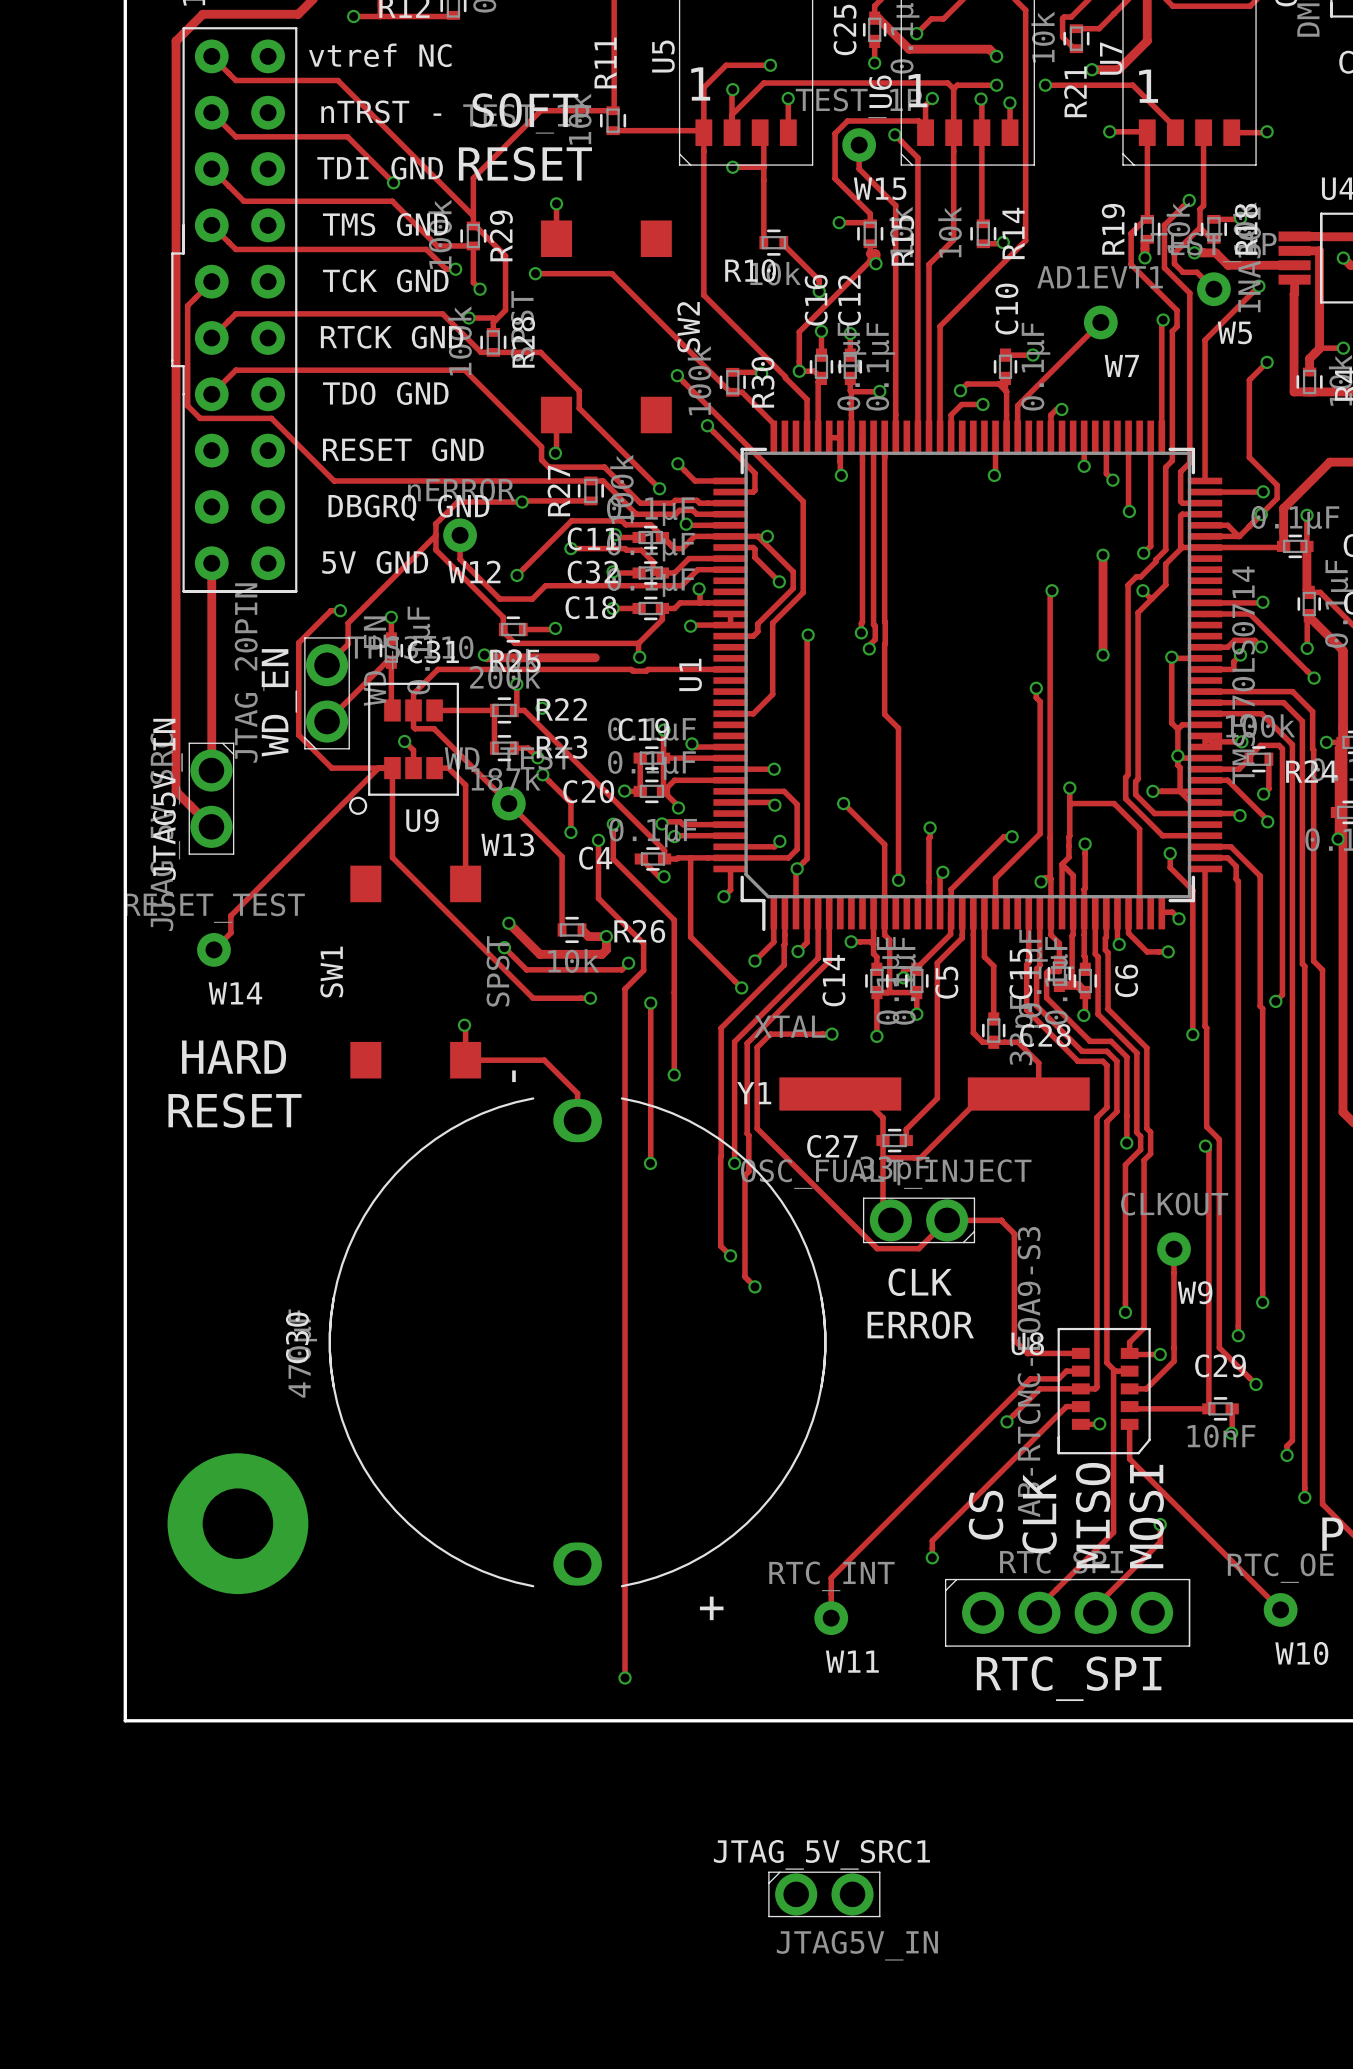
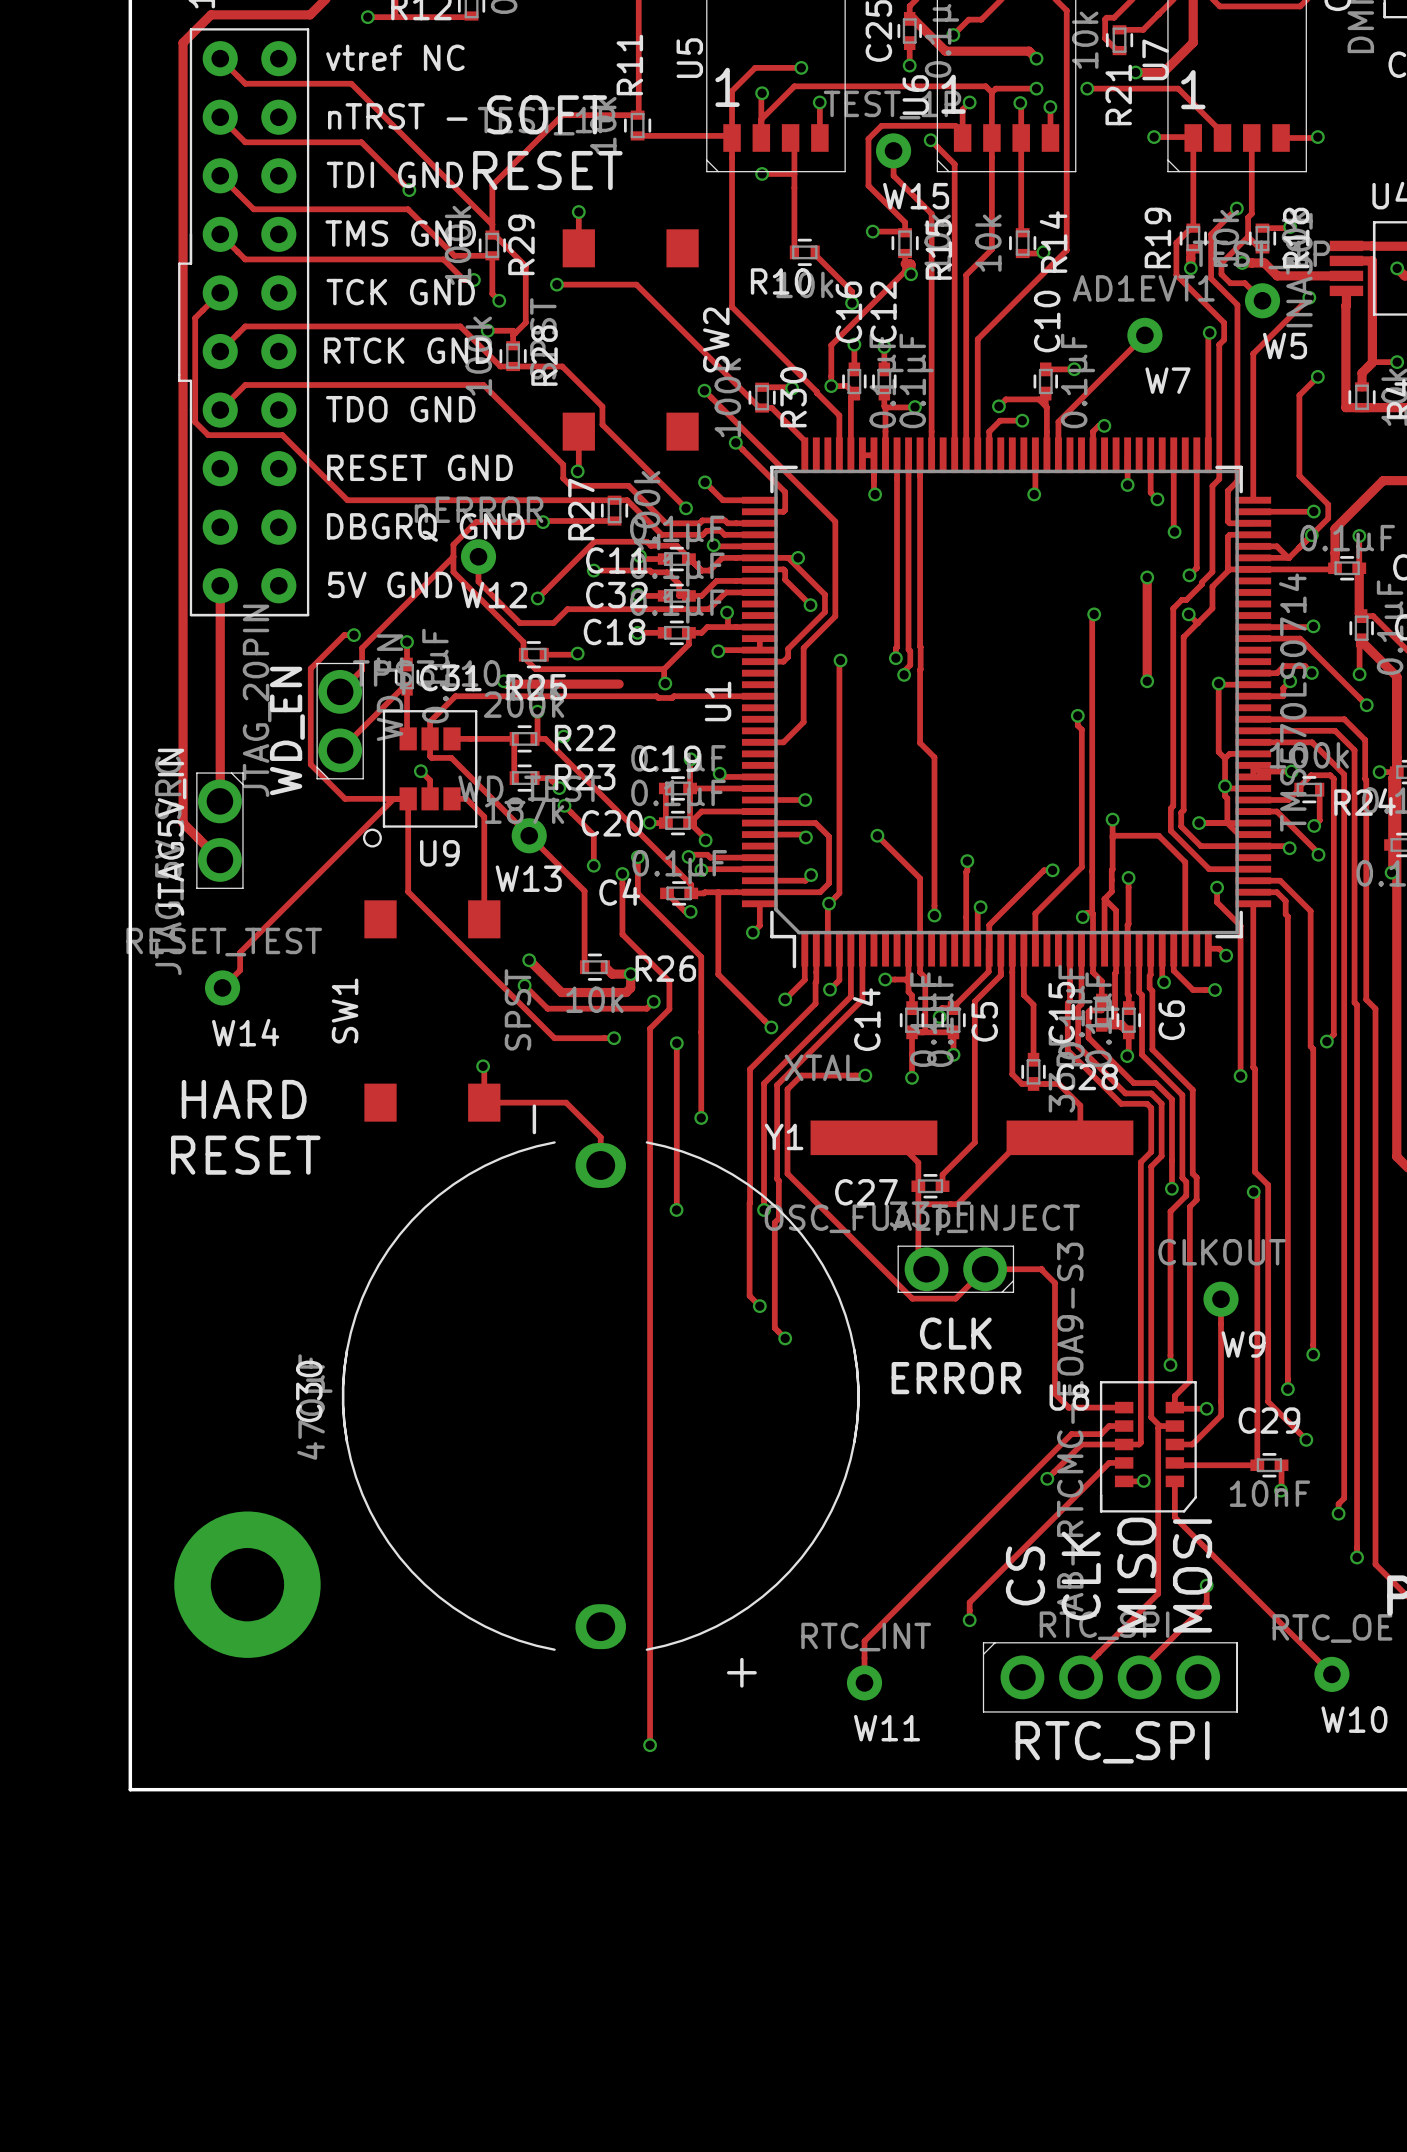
JTAG_5V_SRC1: JTAG5V_IN (824, 1894) -> none

